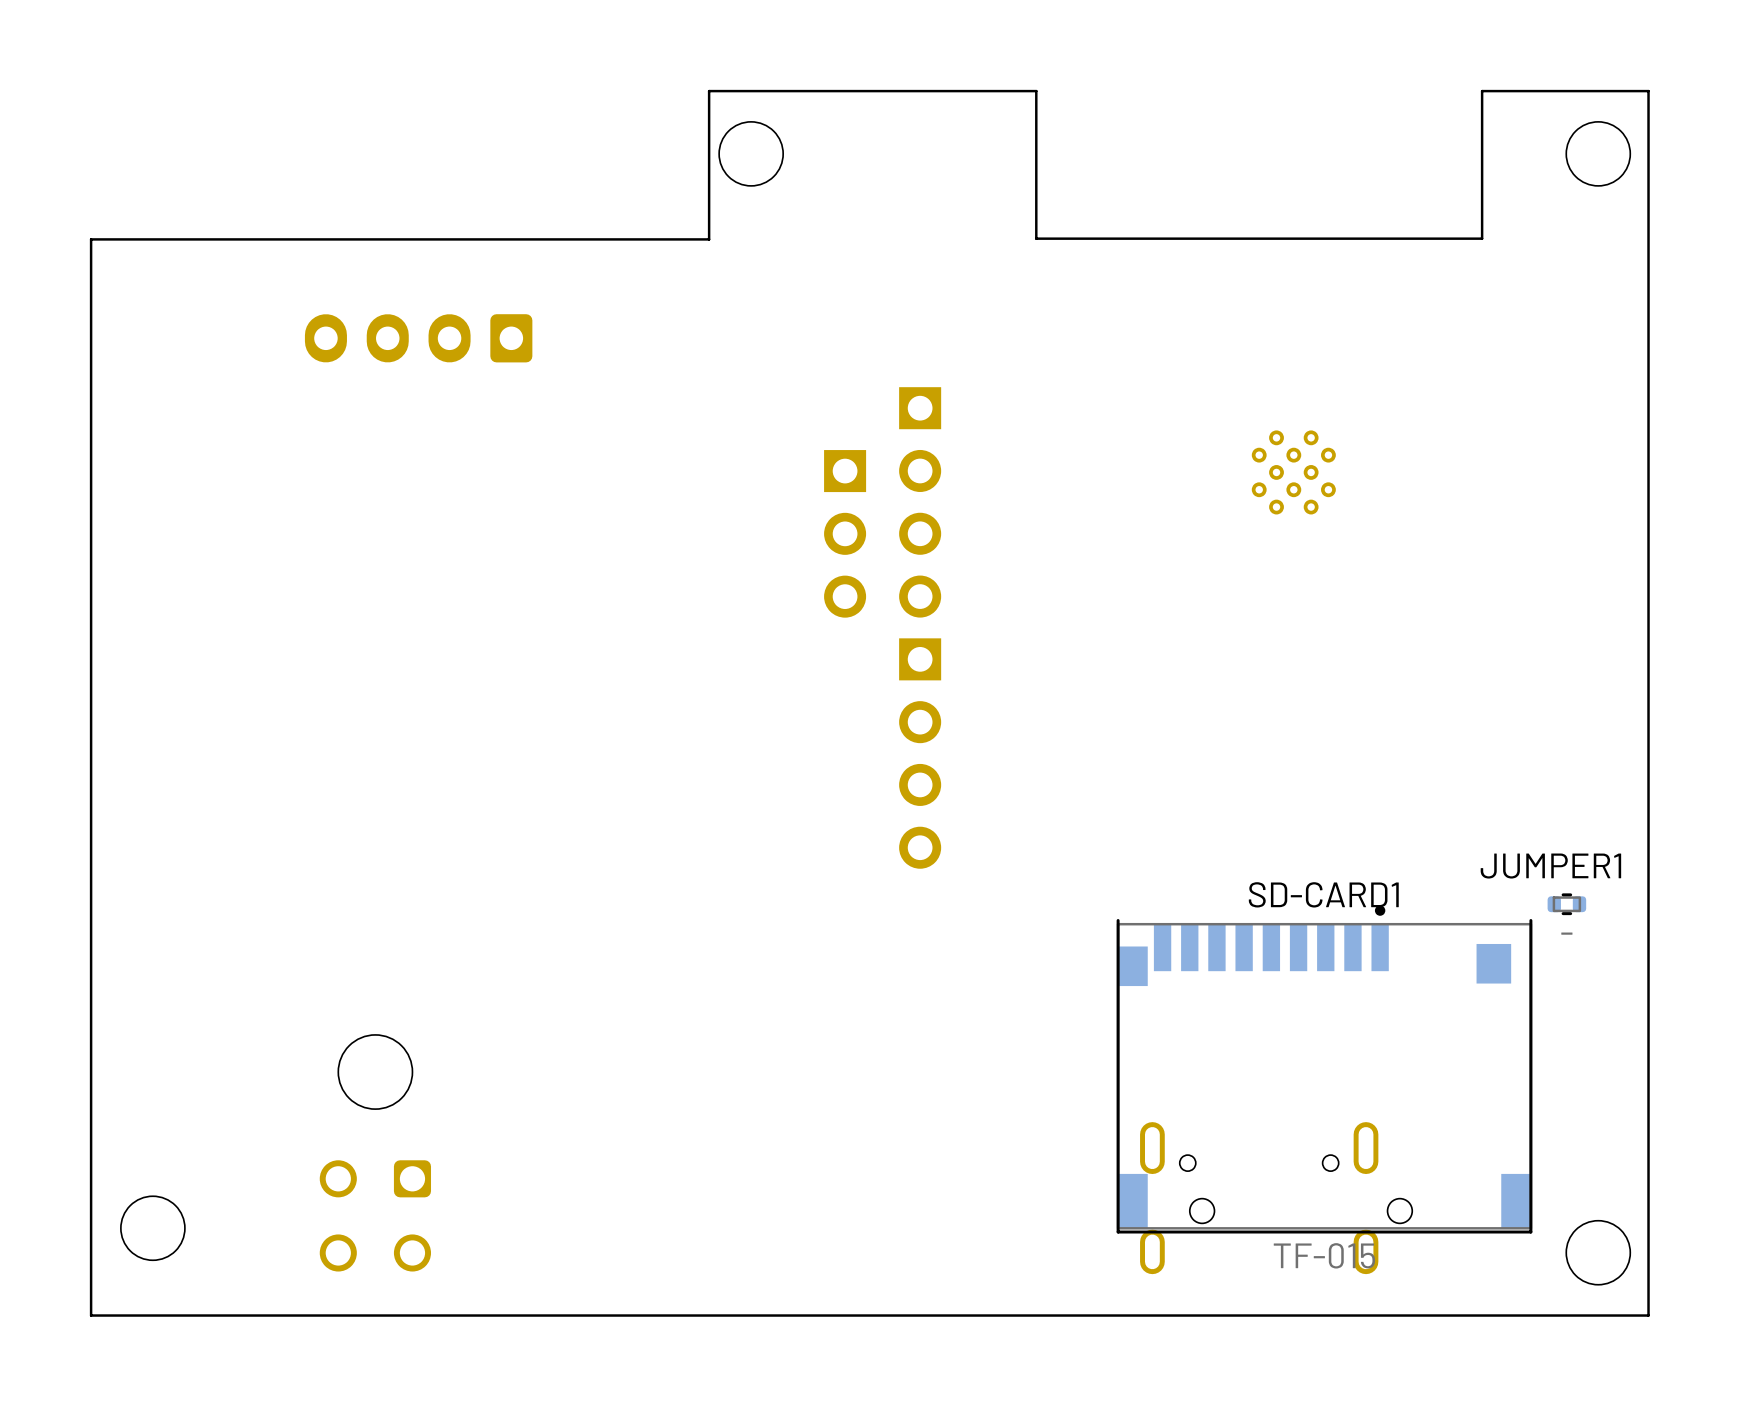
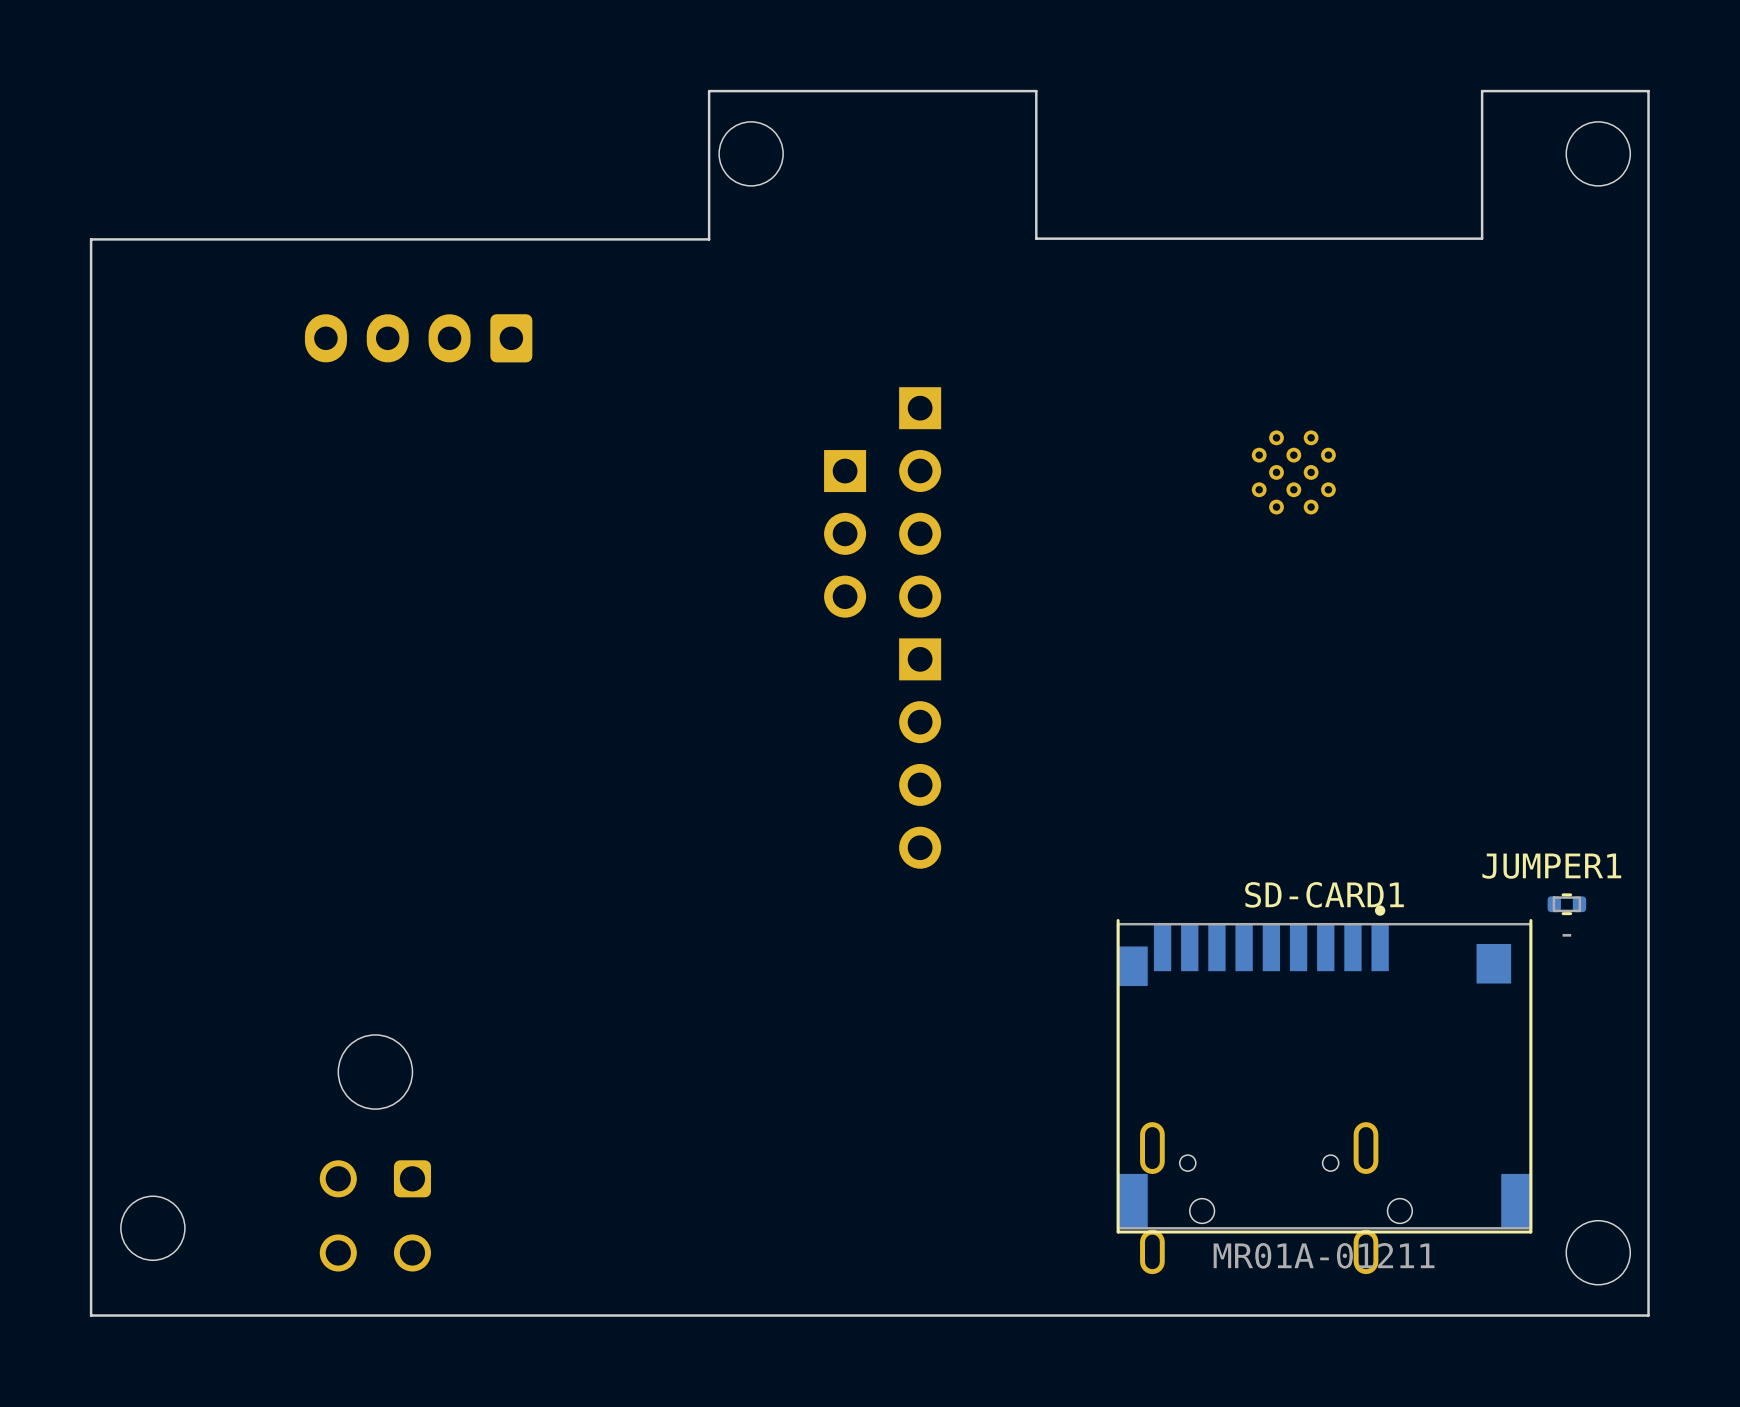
SD-CARD1 value: TF-015 (1324, 1255) -> MR01A-01211 (1324, 1255)

